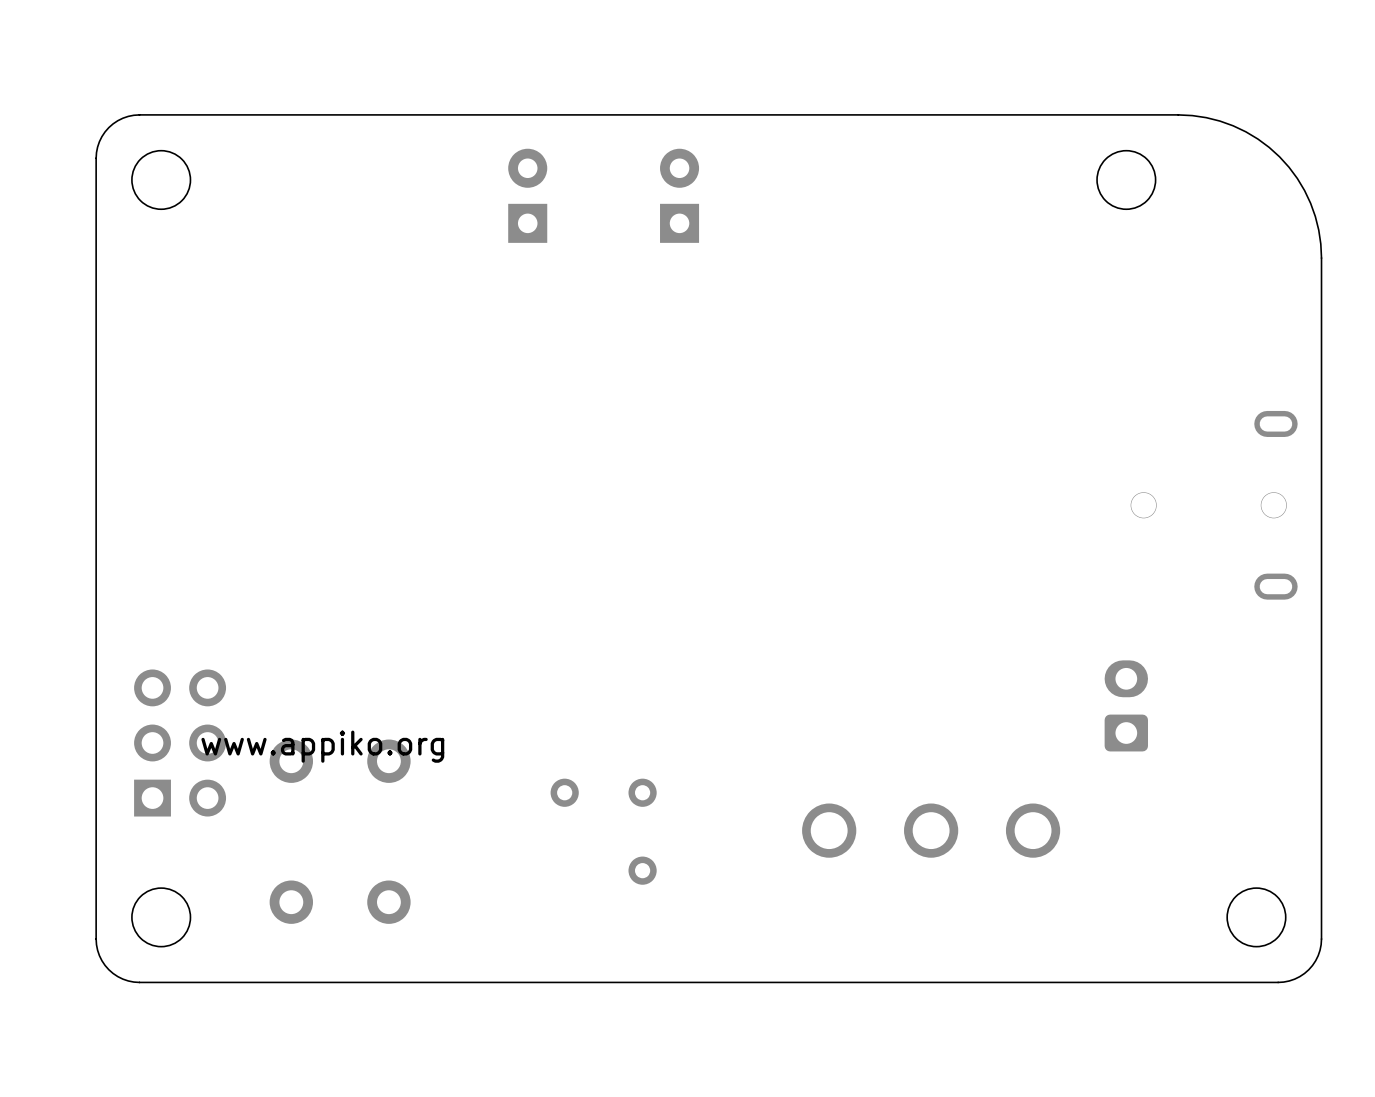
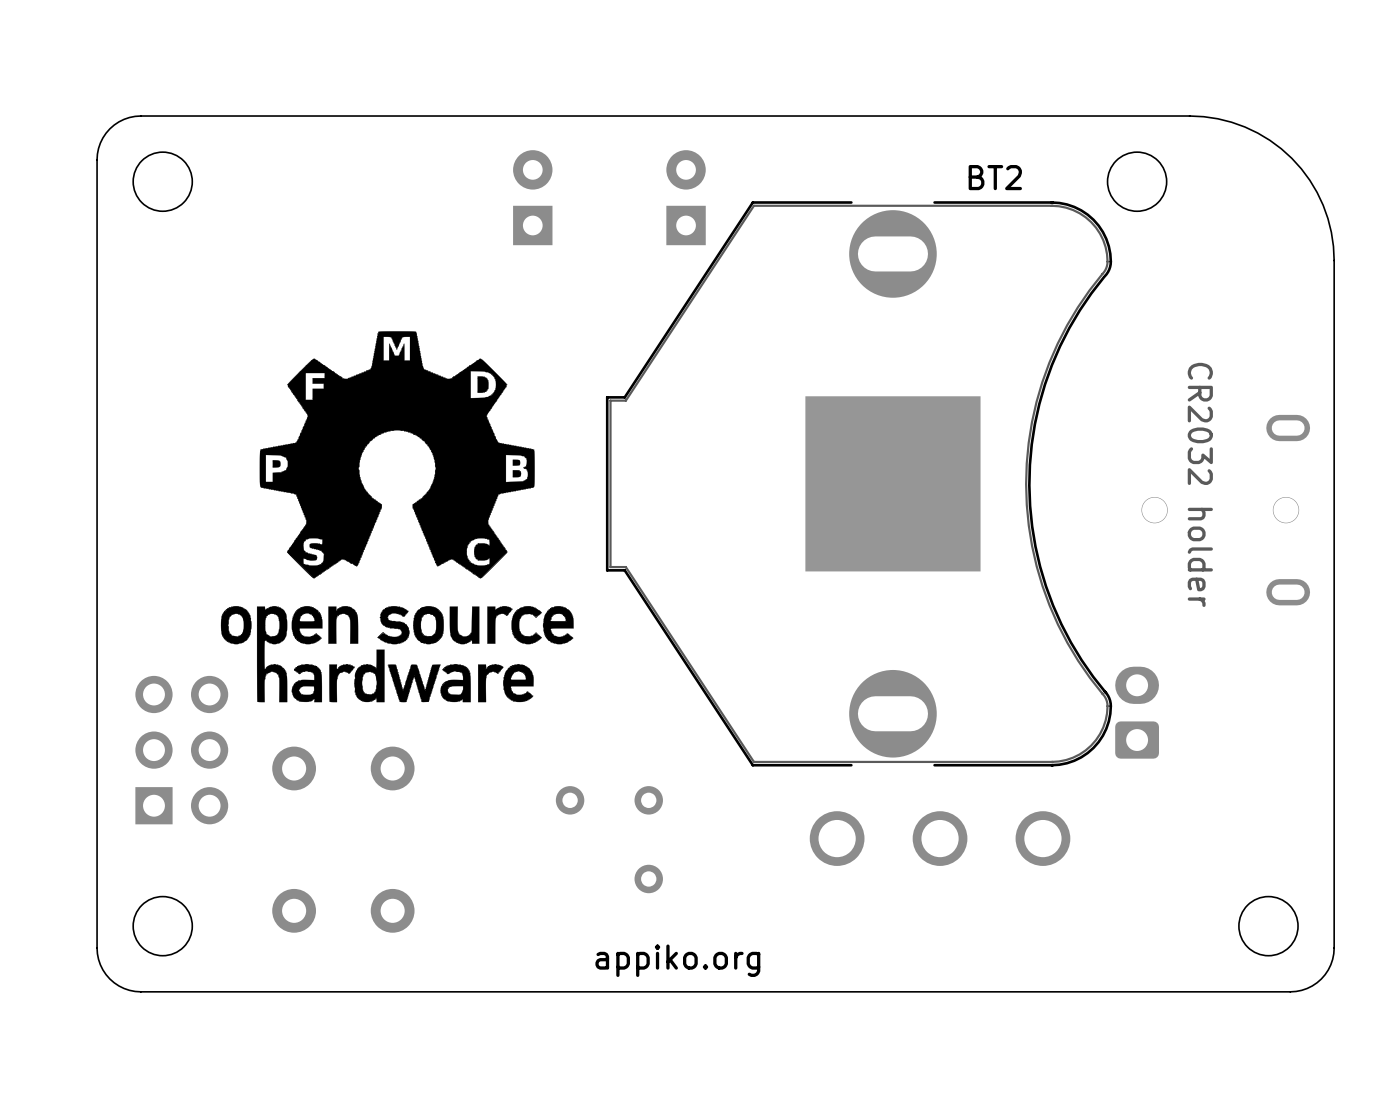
drawing: none -> [220, 331, 574, 703]
BT2: none -> CR2032 holder (859, 483)
text: www.appiko.org (322, 746) -> none
text: none -> appiko.org (677, 960)

